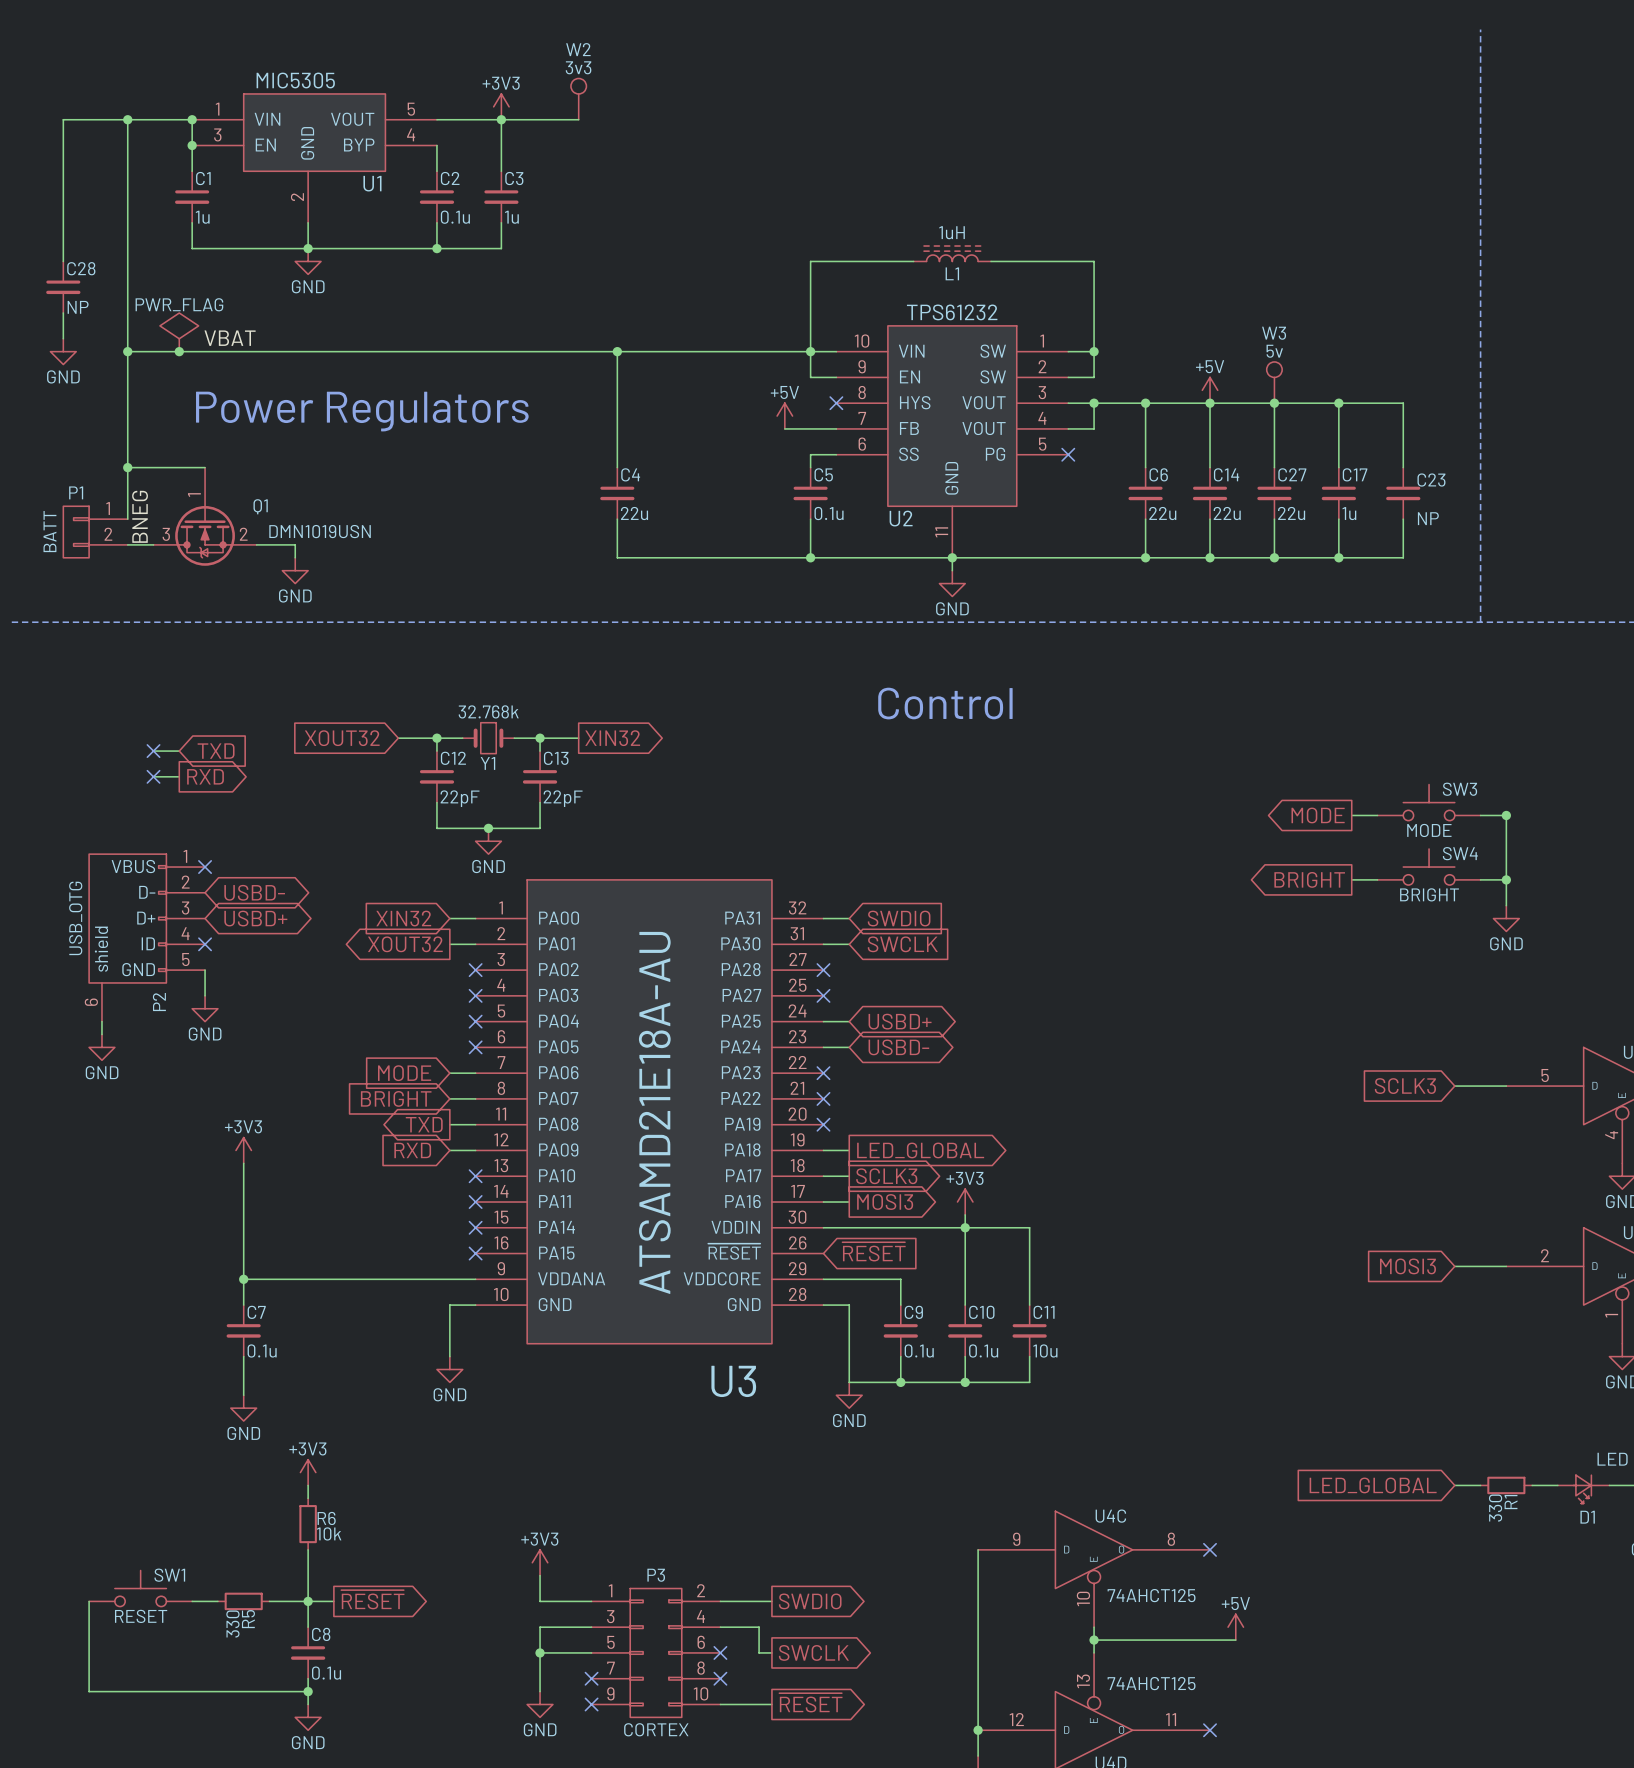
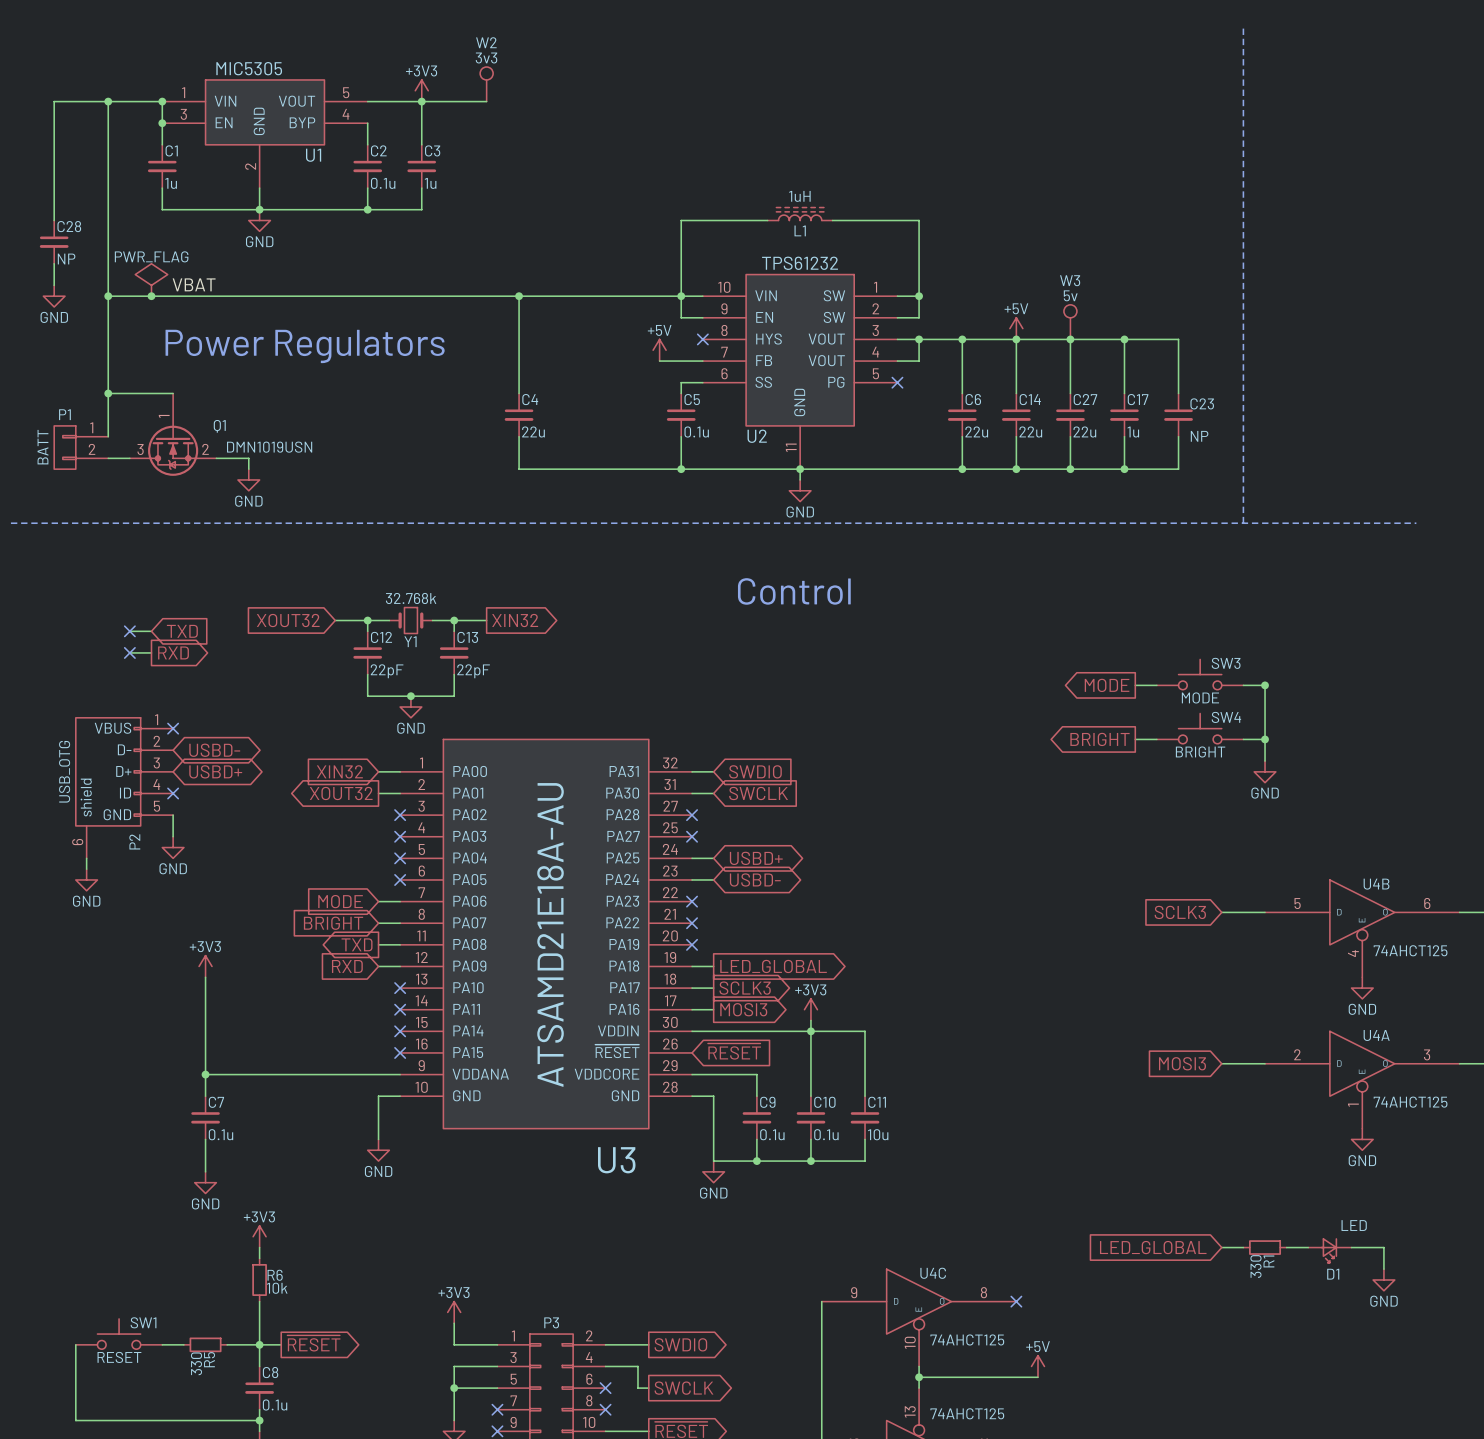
label: BNEG (140, 516) -> none

